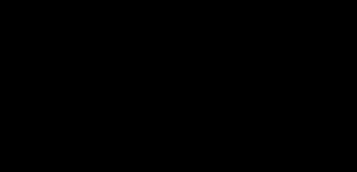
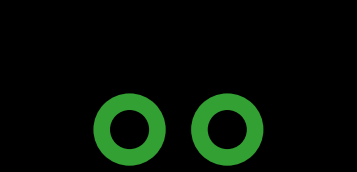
part: none -> (178, 129)

